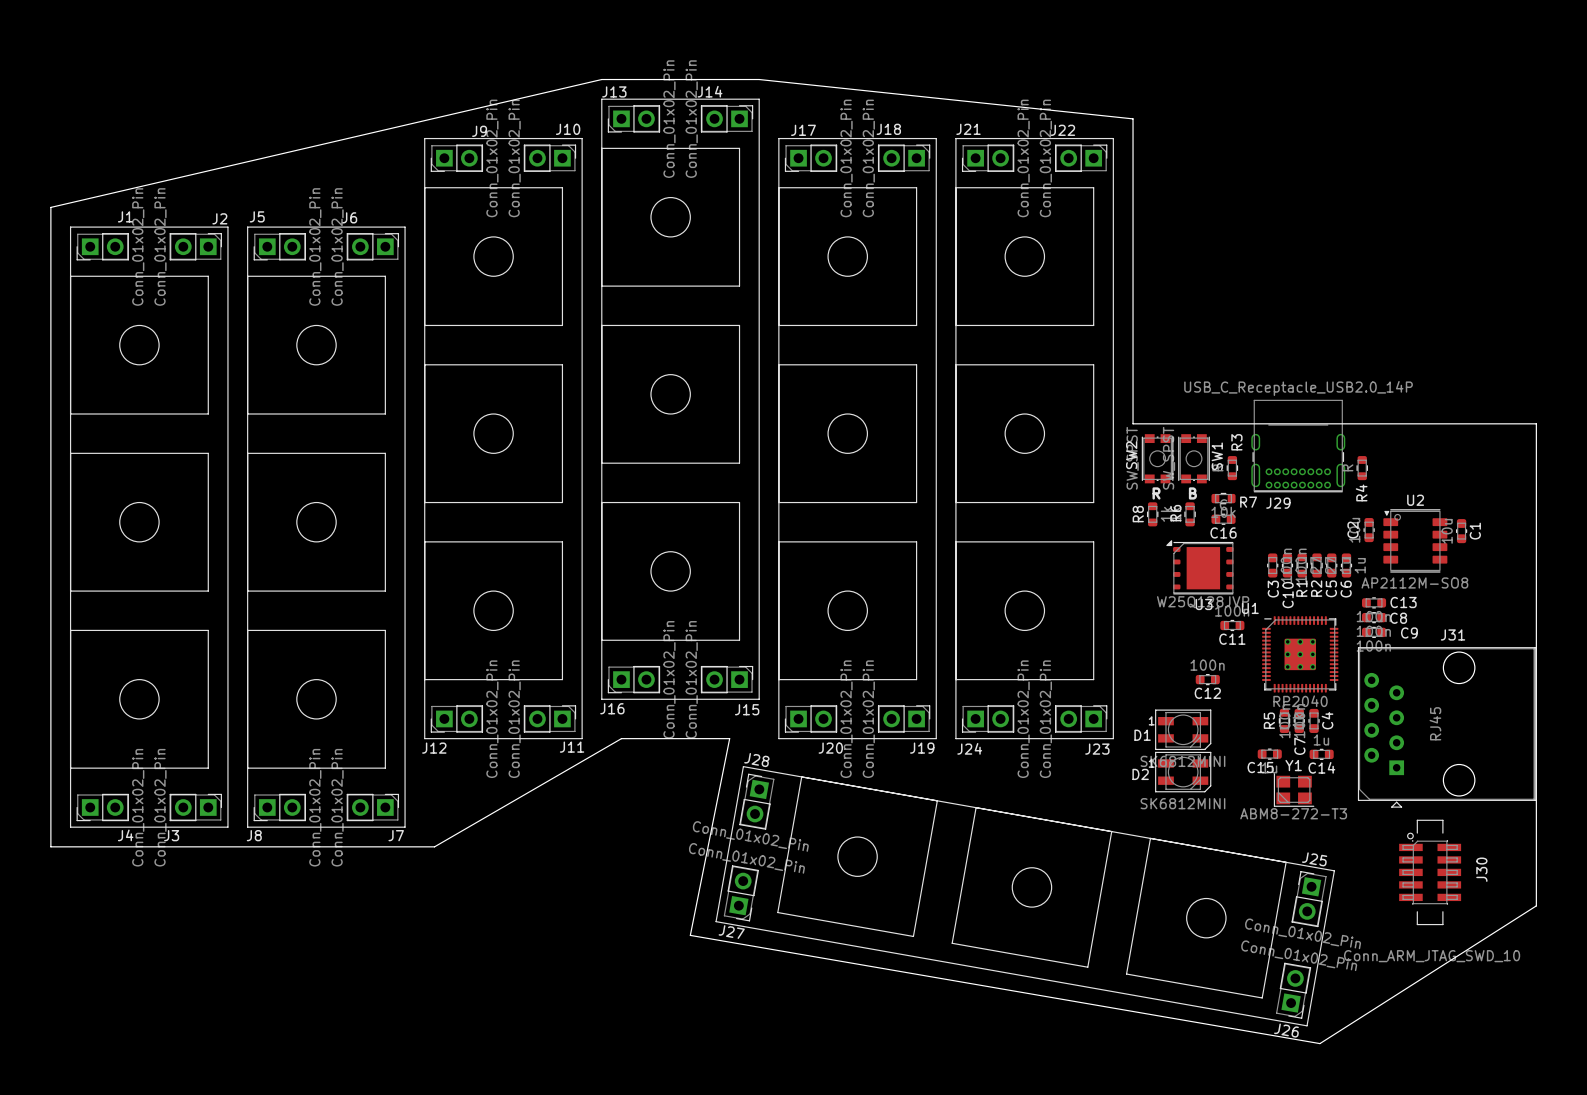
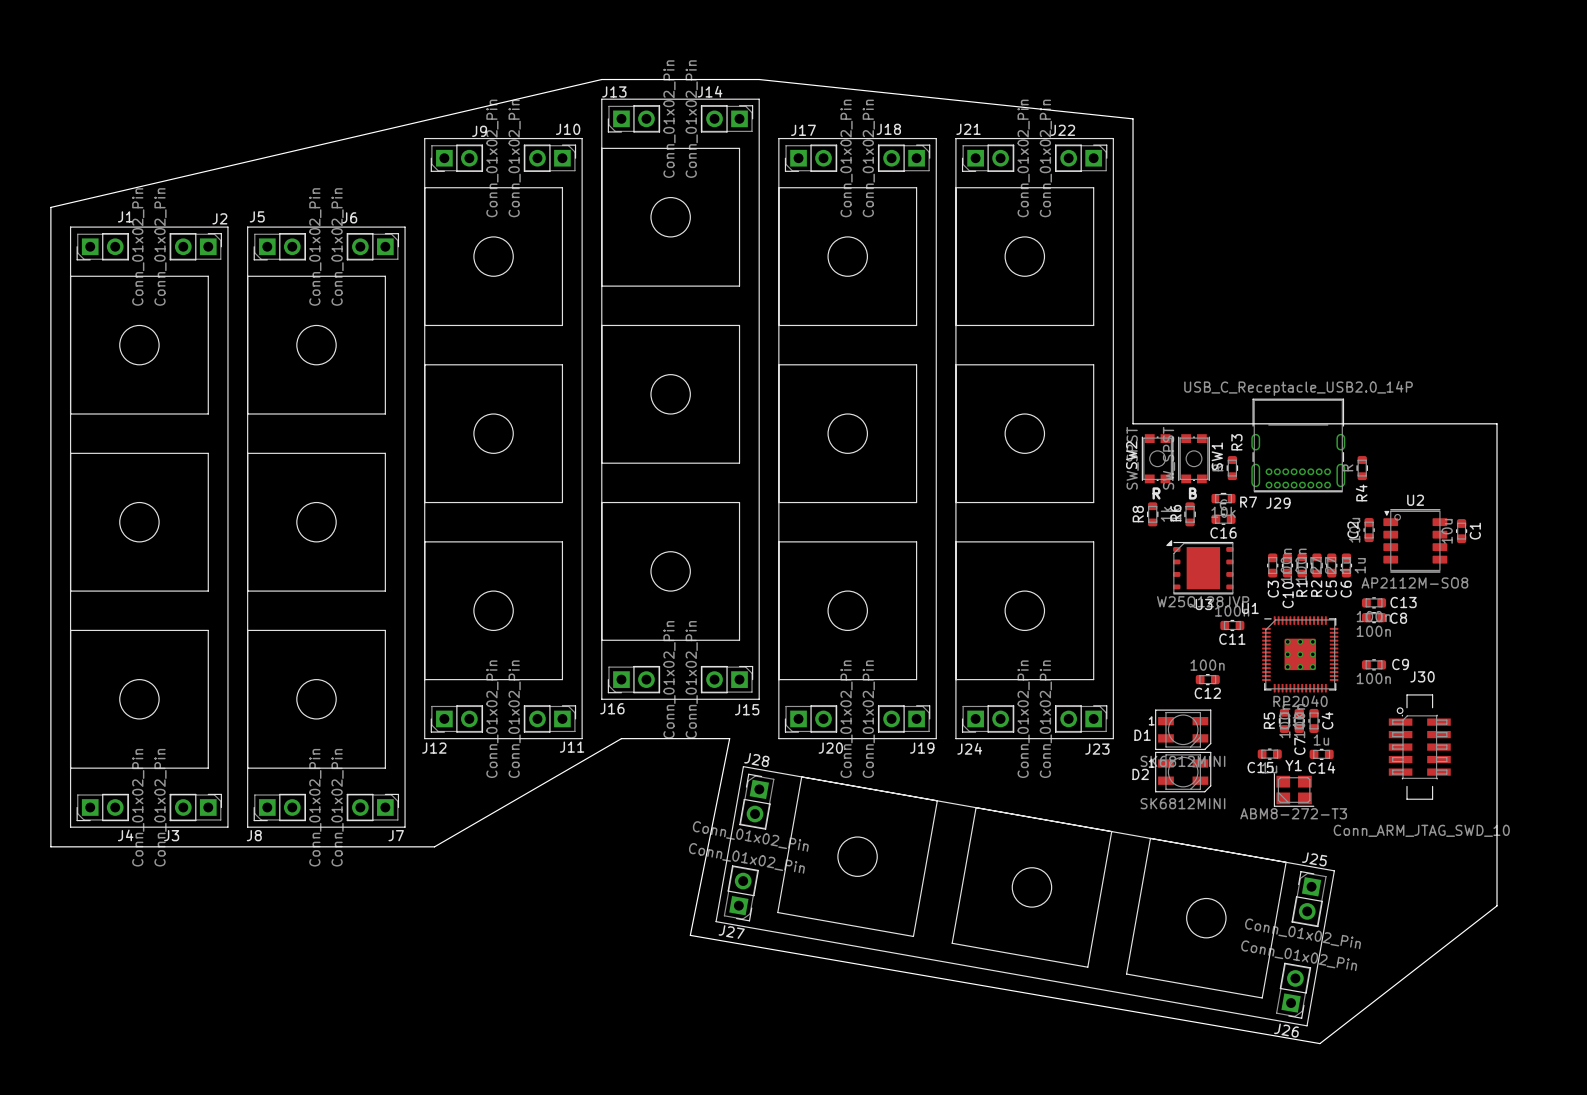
J29 footprint: [1251, 399, 1346, 493] -> [1251, 398, 1346, 493]
board edge: (1497, 423) (1536, 423) (1536, 905) (1319, 1043) -> (1497, 423) (1497, 905) (1319, 1043)
C9 position: (1374, 632) -> (1374, 664)
C9 name position: C9 (1409, 633) -> C9 (1400, 664)
J31: RJ45 (1446, 727) -> none
J30 name rotation: 0° (1481, 869) -> 90° clockwise (1422, 676)
J30 name position: J30 (1481, 869) -> J30 (1422, 676)
J30 position: (1430, 872) -> (1419, 747)

